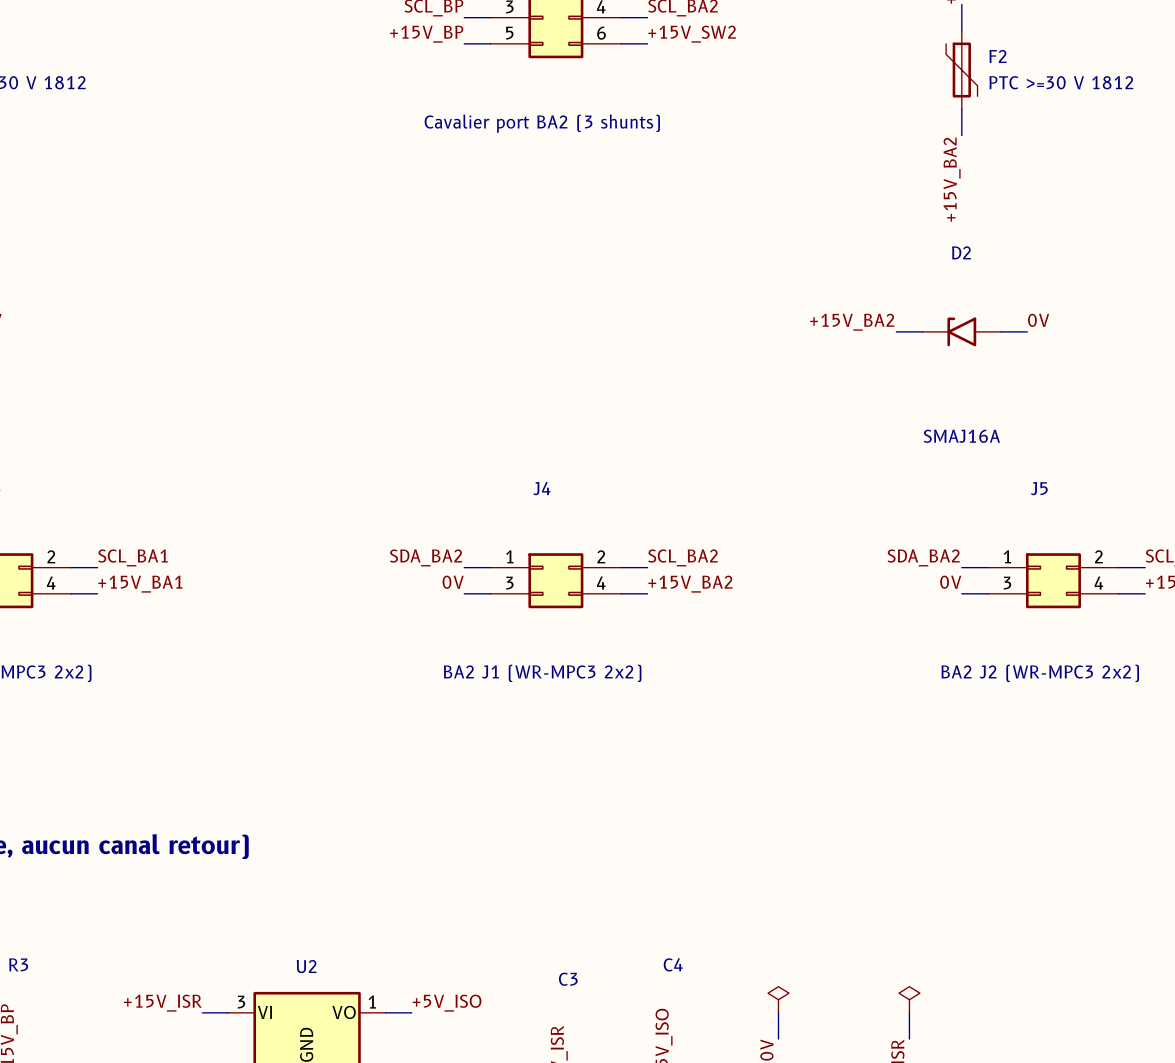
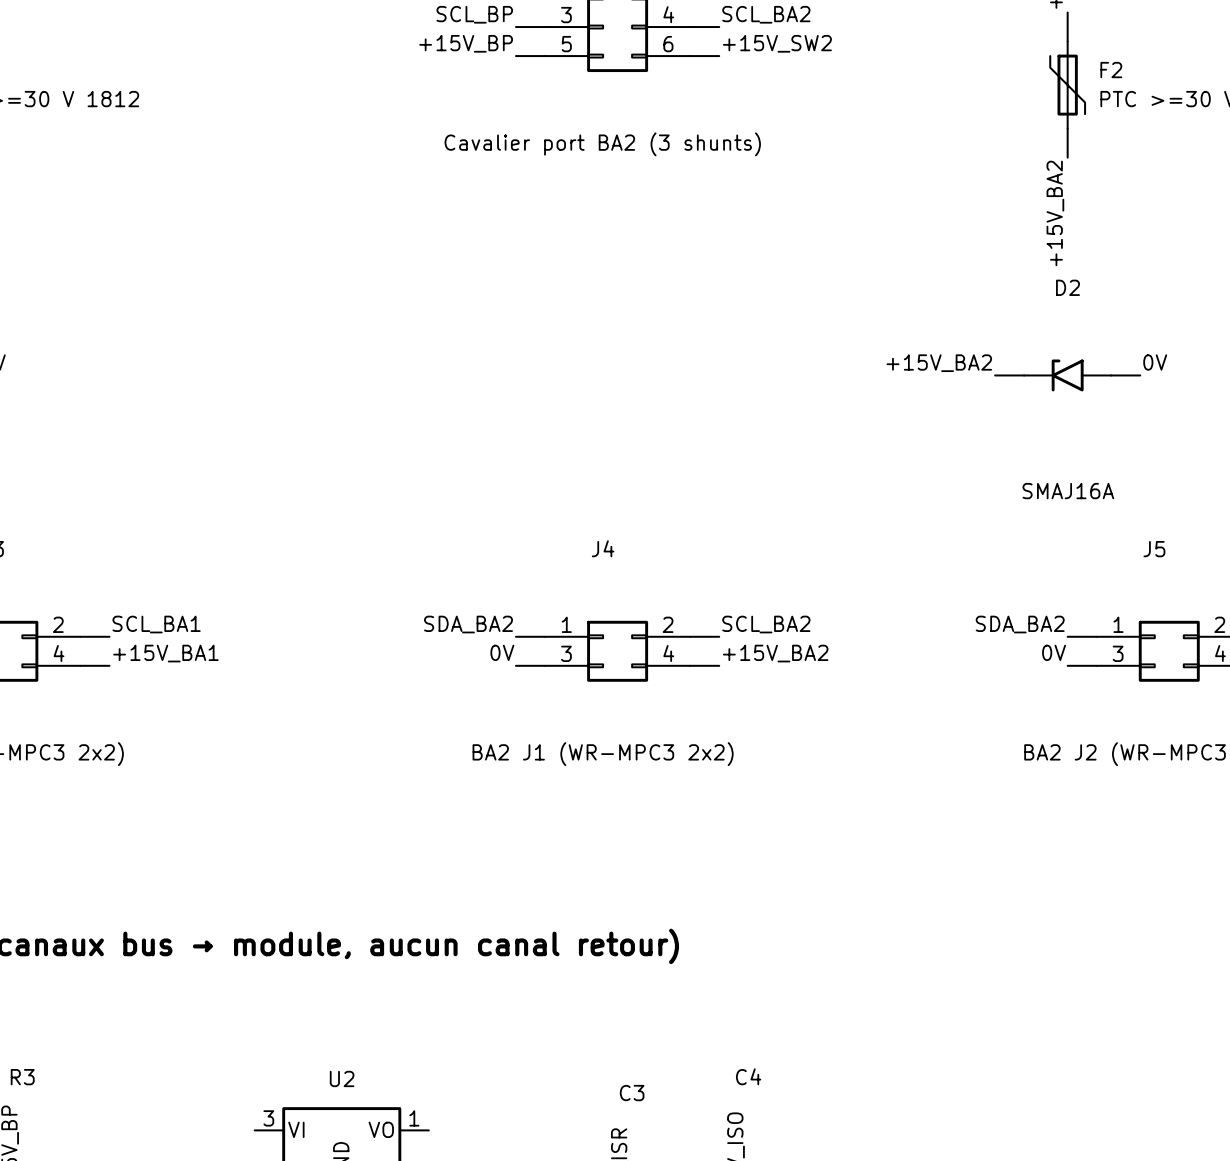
power symbol: (778, 999) -> none
power symbol: (909, 999) -> none
label: +15V_ISR (162, 1003) -> none
label: +5V_ISO (447, 1003) -> none
wire: (202, 1012) (228, 1012) -> none
wire: (385, 1012) (411, 1012) -> none
wire: (778, 1012) (778, 1039) -> none
wire: (909, 1012) (909, 1039) -> none

